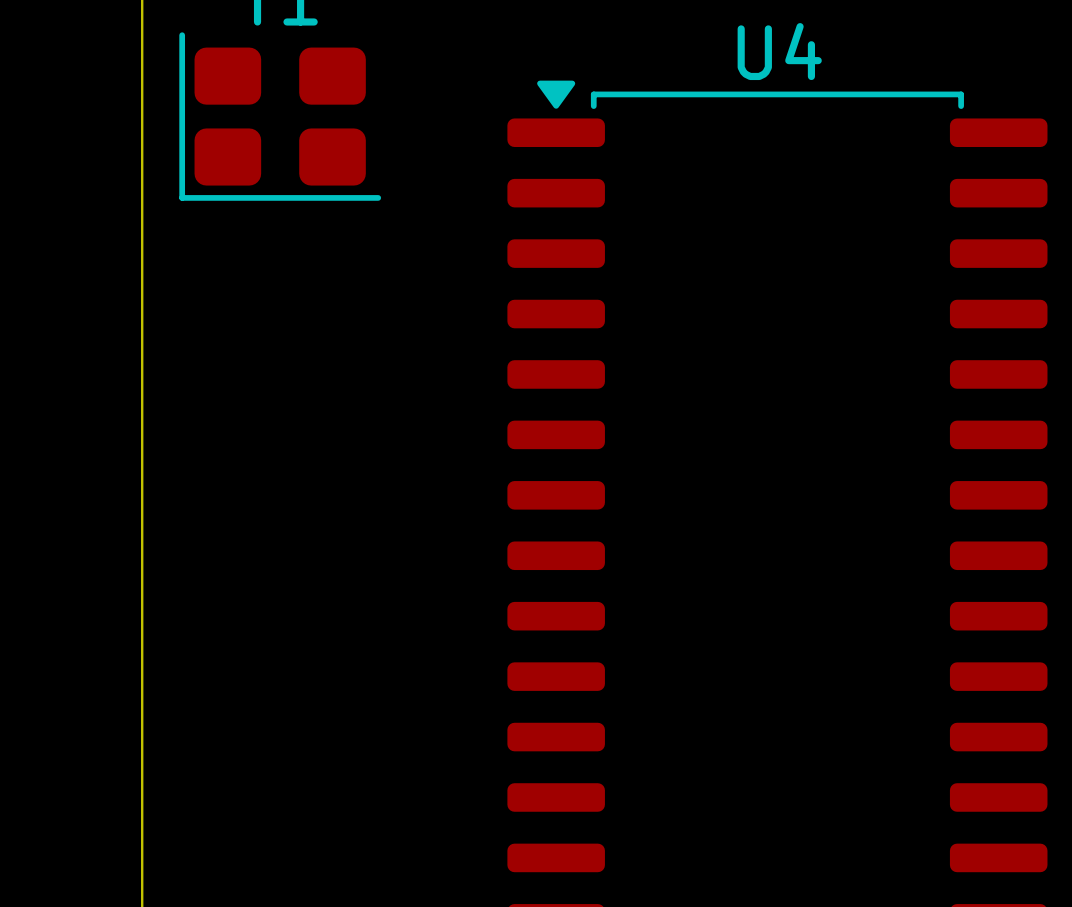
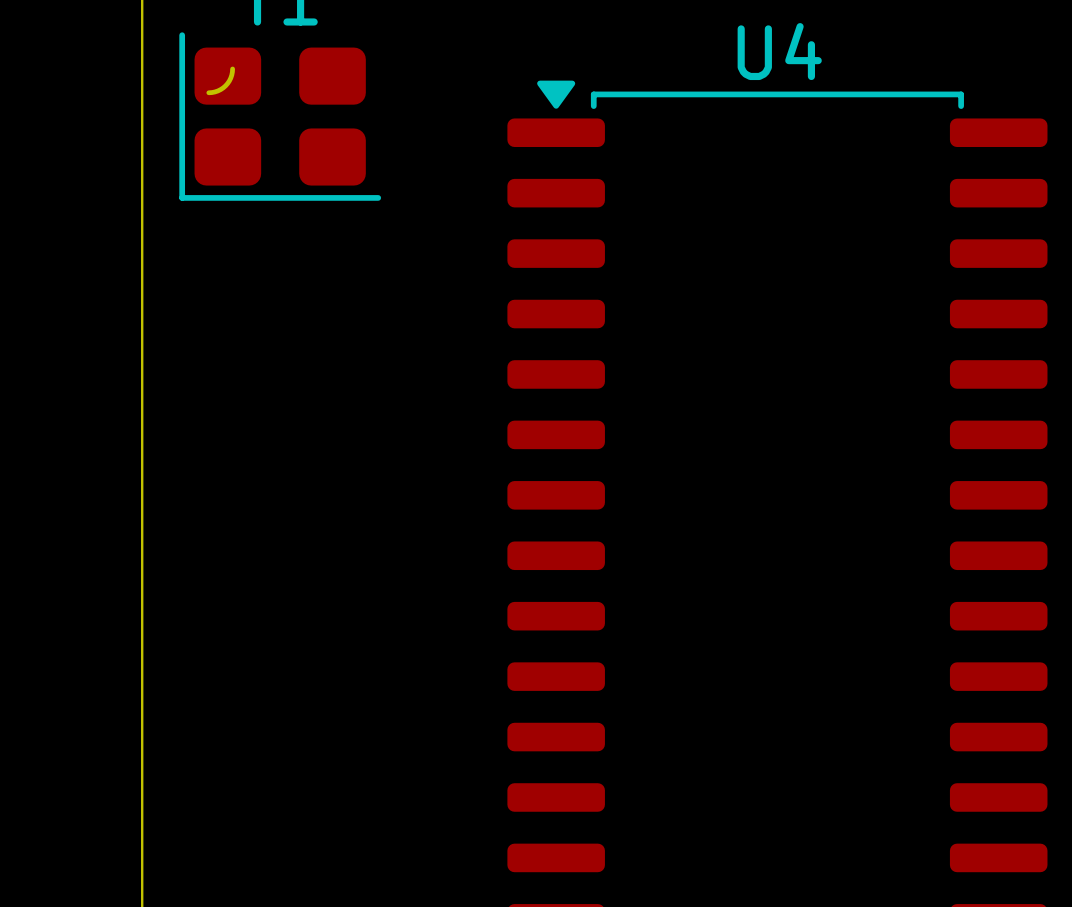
board edge: none -> (232, 68) (230, 78) (225, 85) (217, 90) (208, 92)

